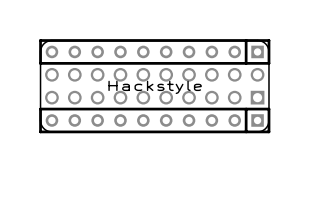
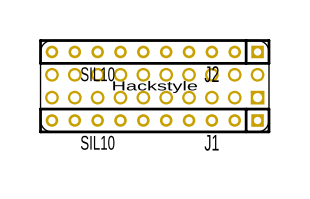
J2 value: none -> SIL10 (97, 74)
J2 name: none -> J2 (211, 74)
J1 value: none -> SIL10 (97, 142)
J1 name: none -> J1 (211, 142)

